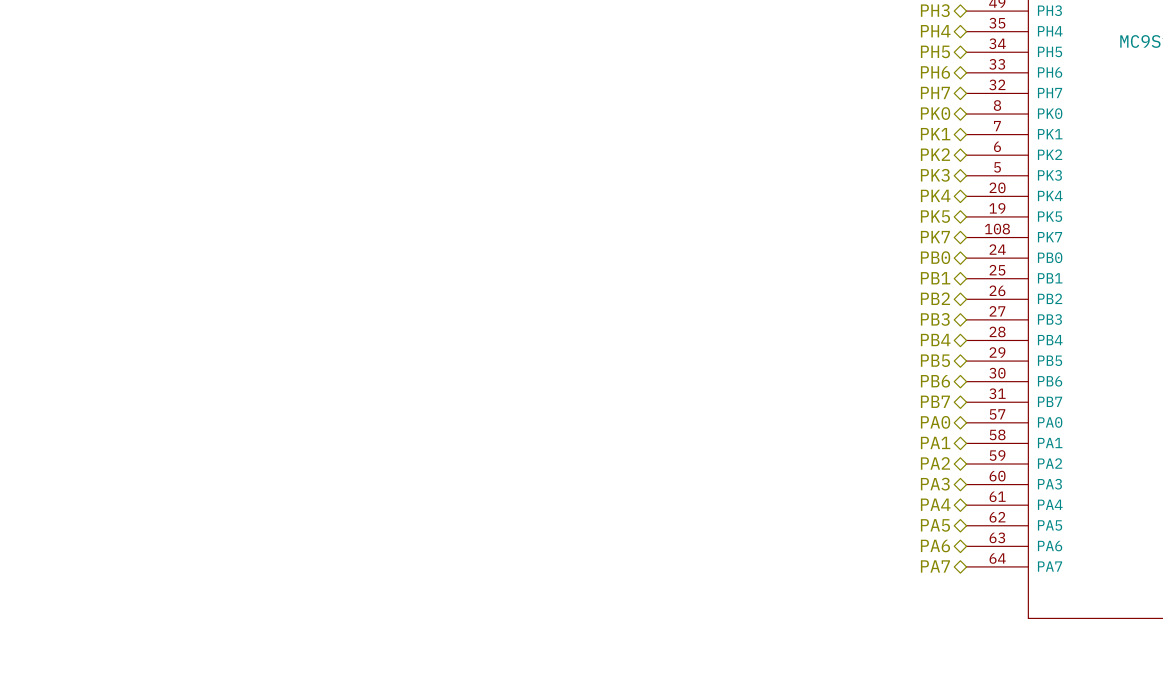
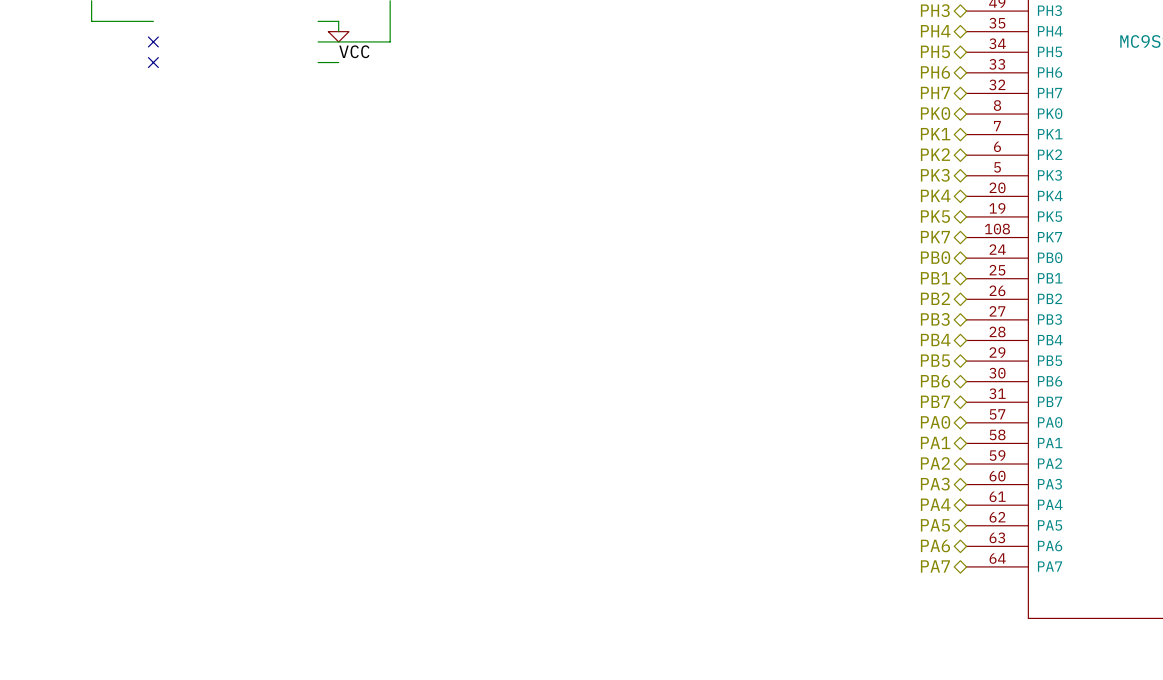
wire: none -> (91, 0) (91, 21) (153, 21)
wire: none -> (390, 0) (390, 41) (318, 41)
wire: none -> (318, 21) (338, 21) (338, 31)
power symbol: none -> (338, 36)
no-connect mark: none -> (153, 41)
label: none -> VCC (354, 51)
no-connect mark: none -> (153, 62)
wire: none -> (318, 62) (338, 62)

